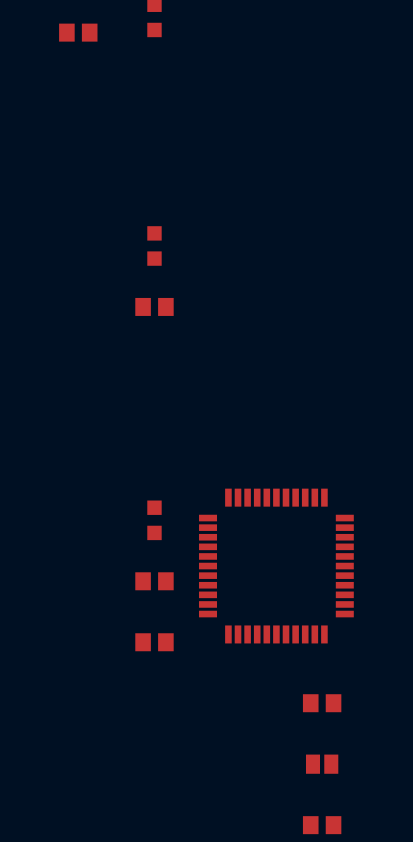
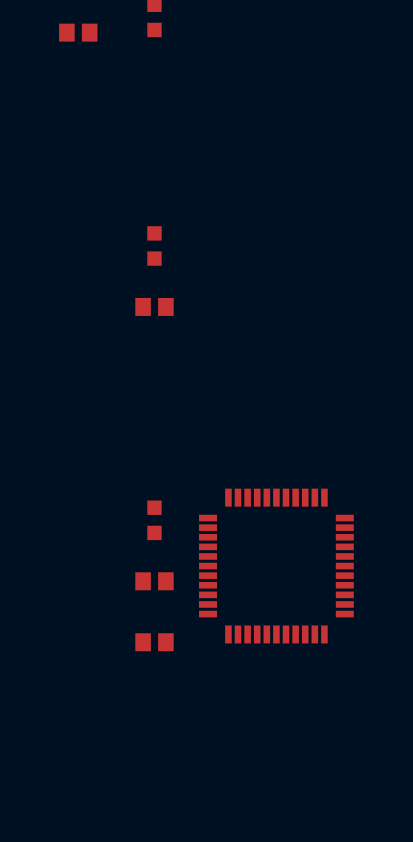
part: (322, 703) -> none
part: (322, 764) -> none
part: (322, 825) -> none

